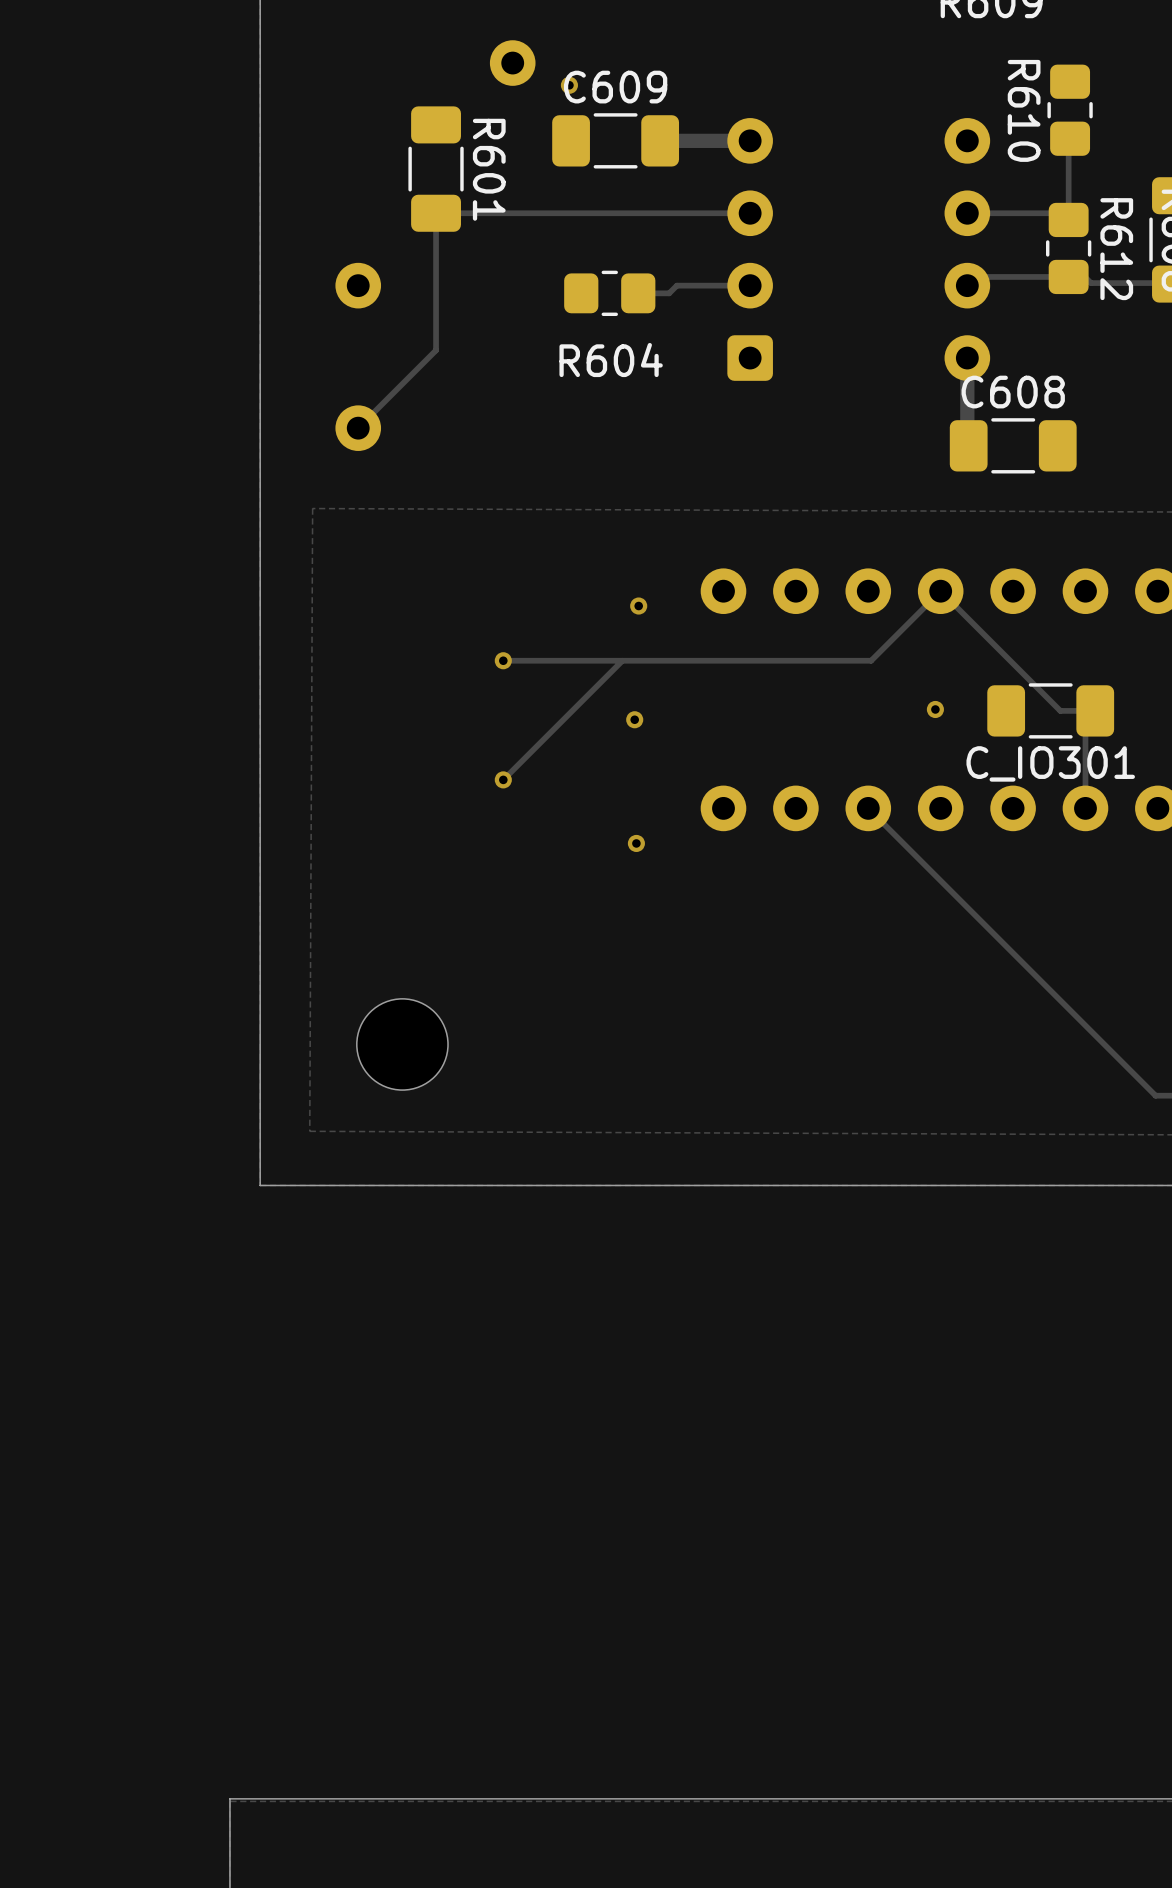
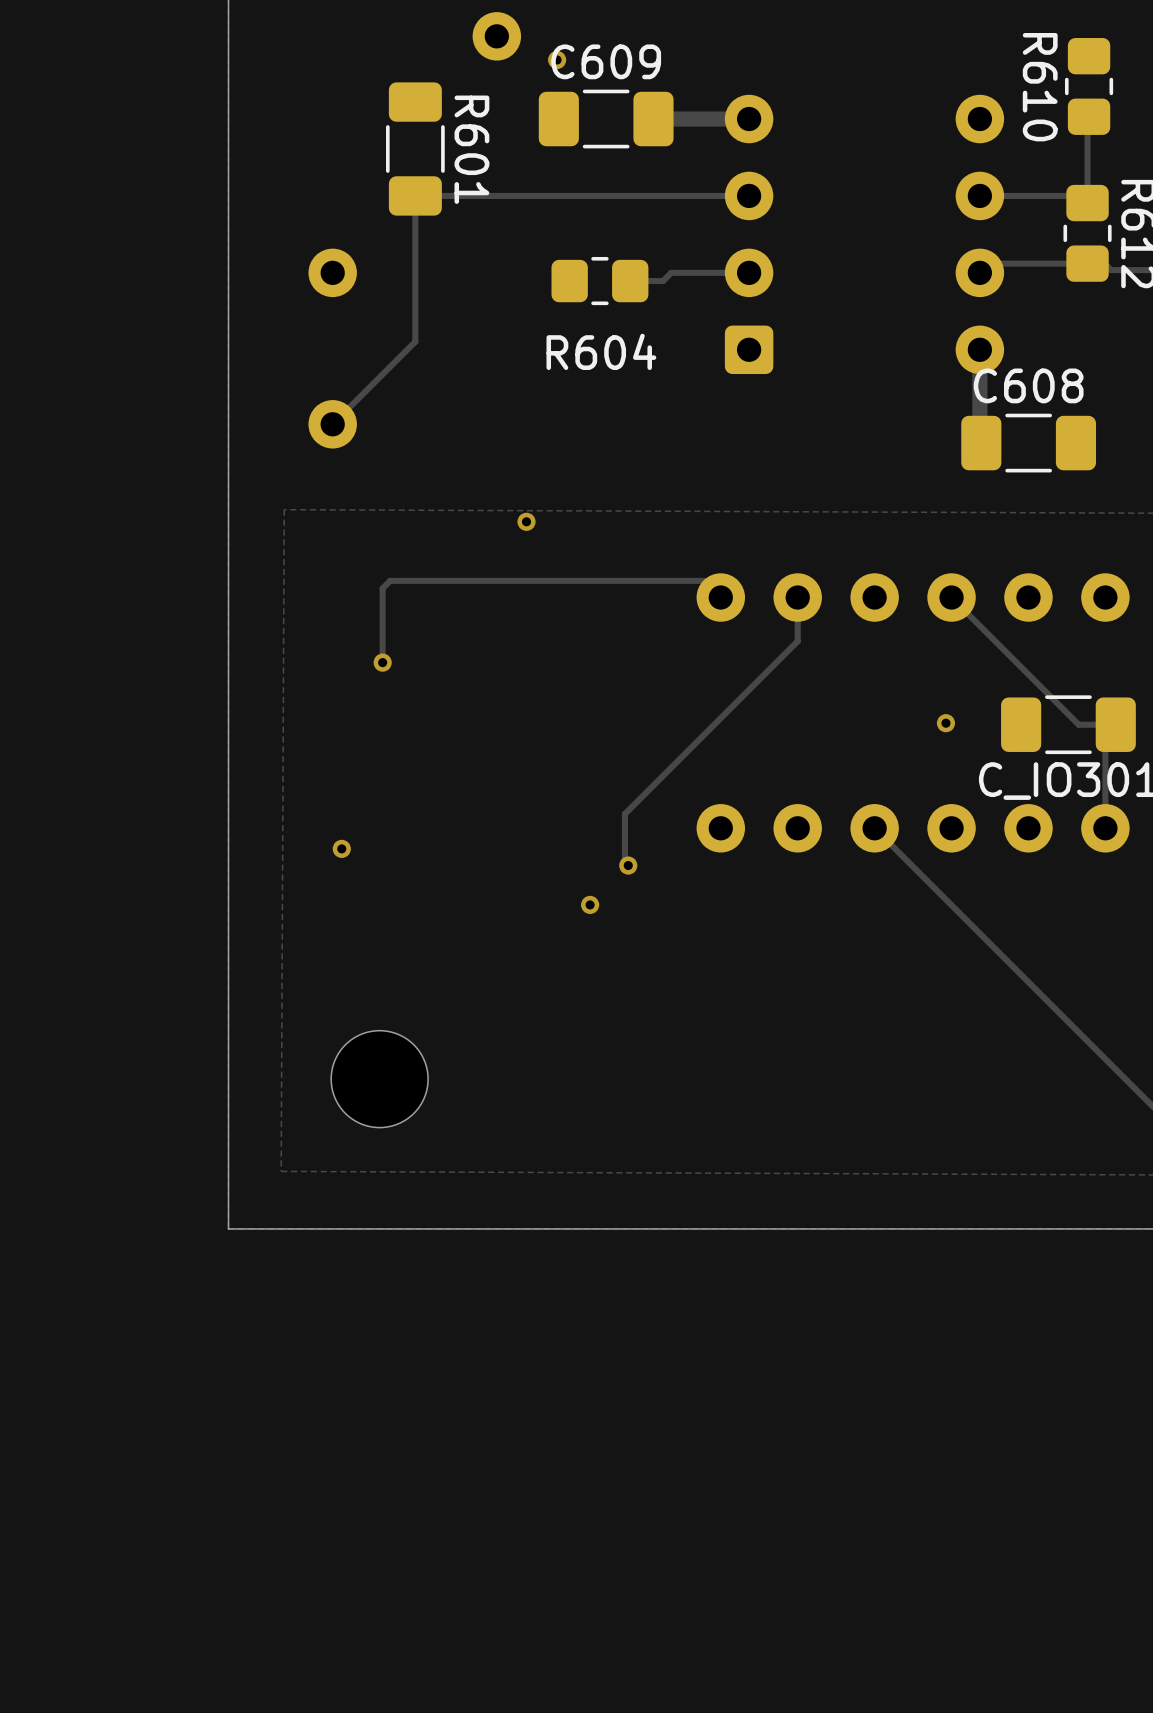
via: none -> (526, 521)
track: none -> (720, 597) (704, 580) (390, 580) (382, 588) (382, 662)
track: none -> (797, 597) (797, 641) (624, 814) (624, 861)
track: (940, 591) (871, 660) (503, 660) -> none
via: (638, 606) -> none
via: none -> (382, 662)
via: (503, 660) -> none
track: (622, 660) (503, 779) -> none
via: (634, 719) -> none
via: (503, 779) -> none
via: none -> (341, 848)
via: none -> (590, 904)

